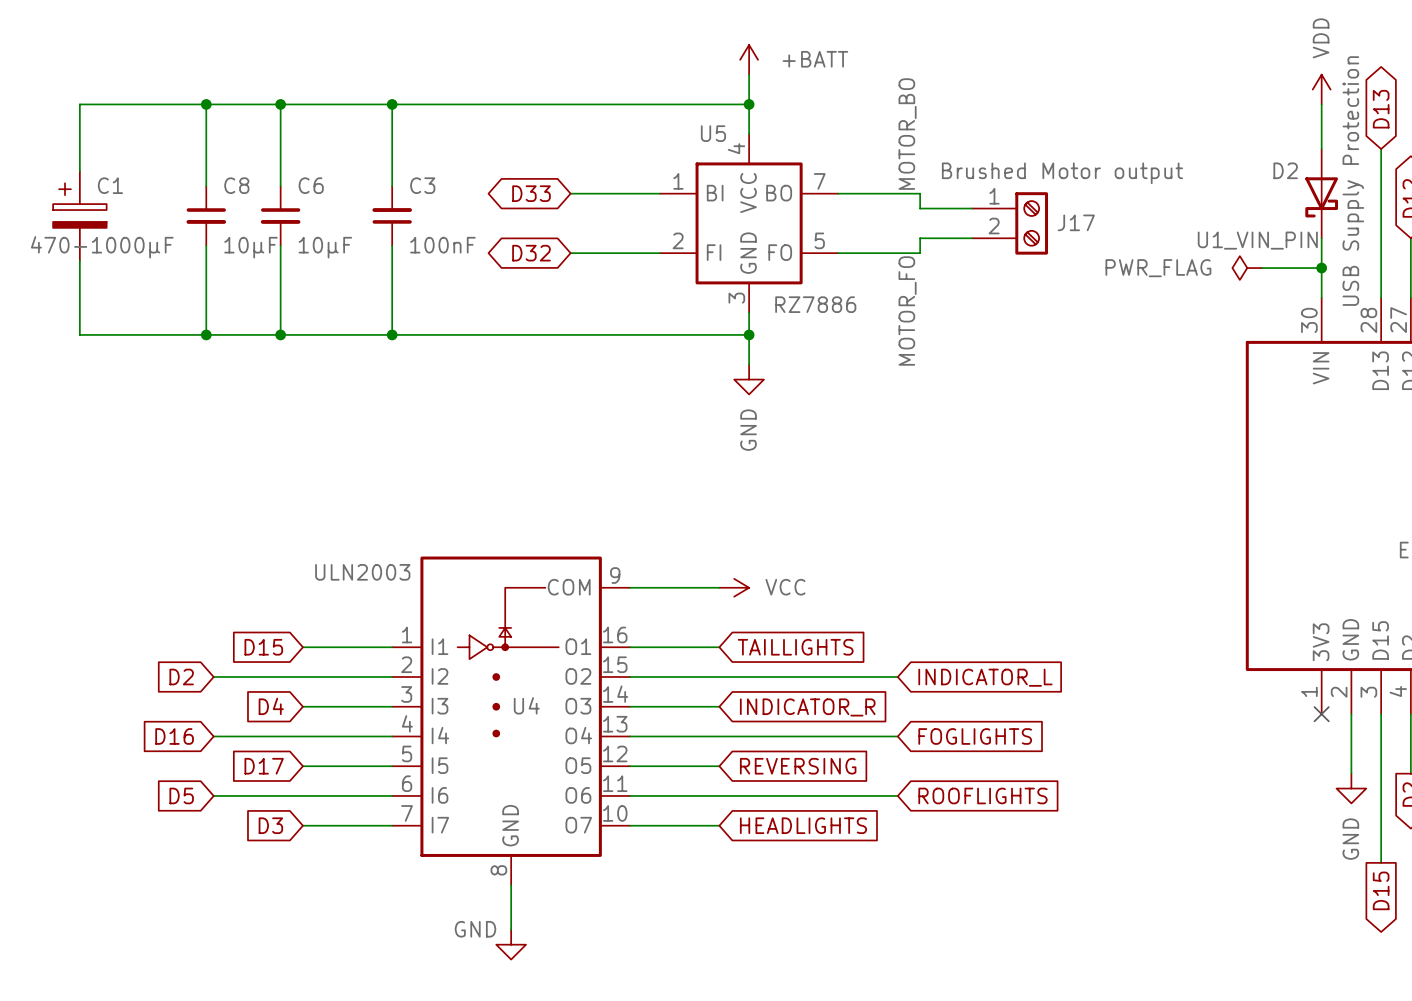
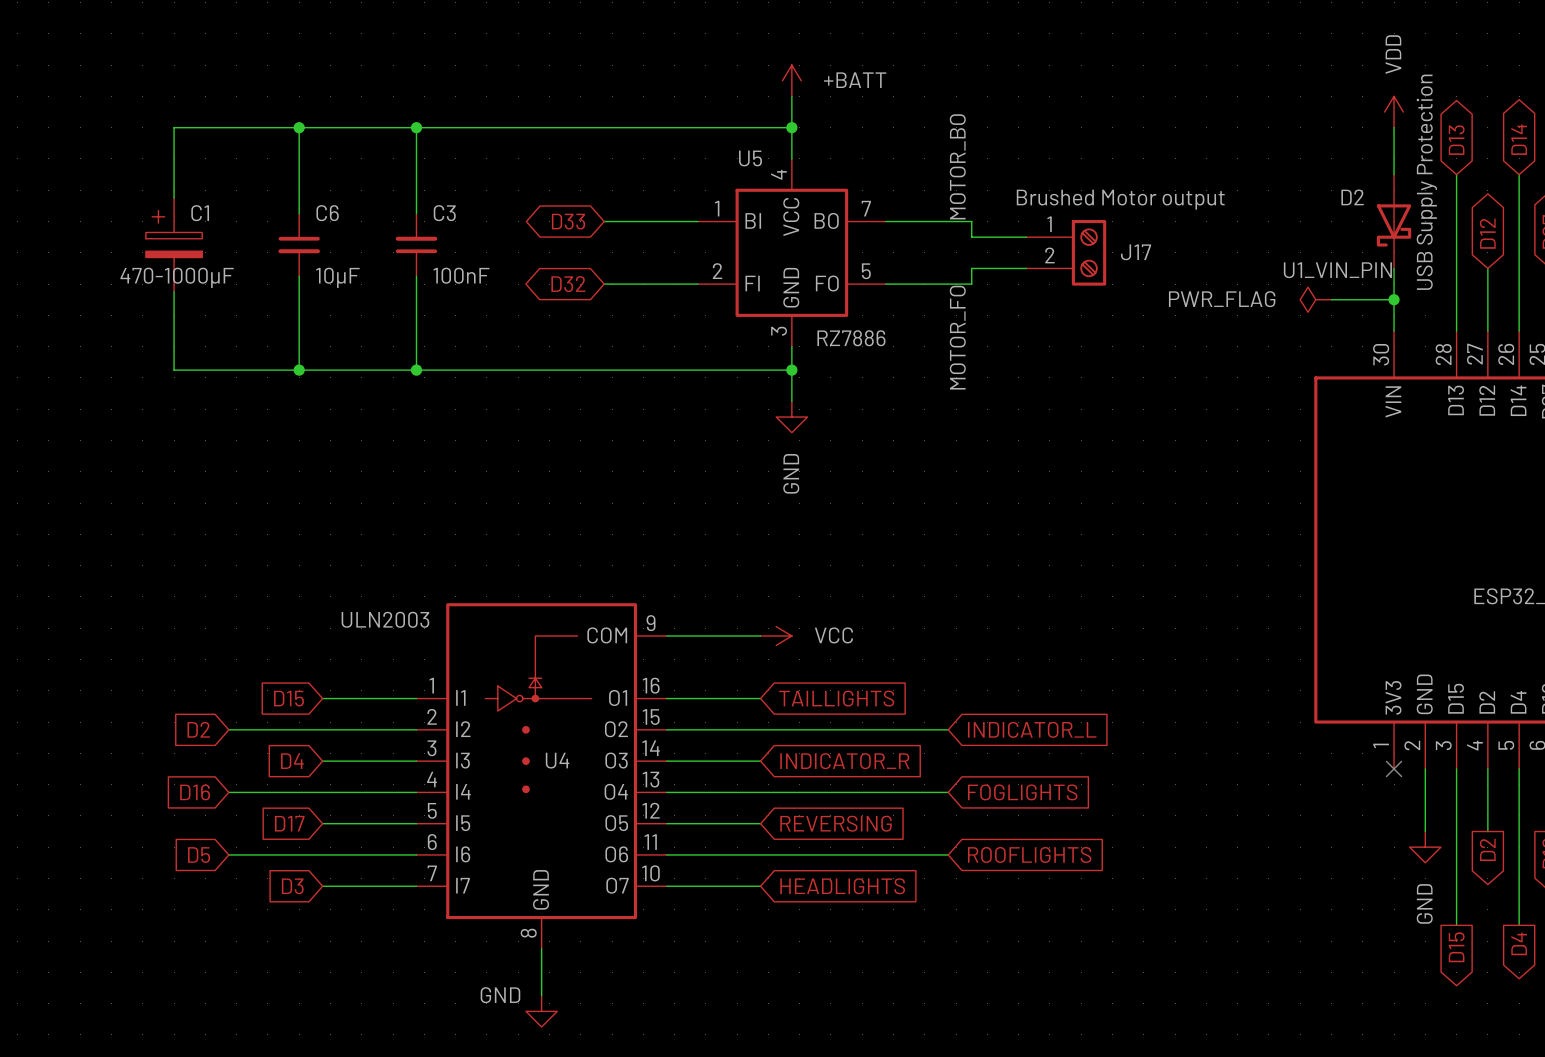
wire: (161, 104) (79, 104) (79, 171) -> (174, 127) (174, 198)
wire: (206, 104) (206, 186) -> none
junction: (206, 104) -> none
C1 position: (79, 215) -> (174, 244)
C8: 10µF (206, 215) -> none
wire: (206, 245) (206, 334) -> none
wire: (79, 260) (79, 334) (161, 334) -> (174, 291) (174, 370)
junction: (206, 334) -> none

